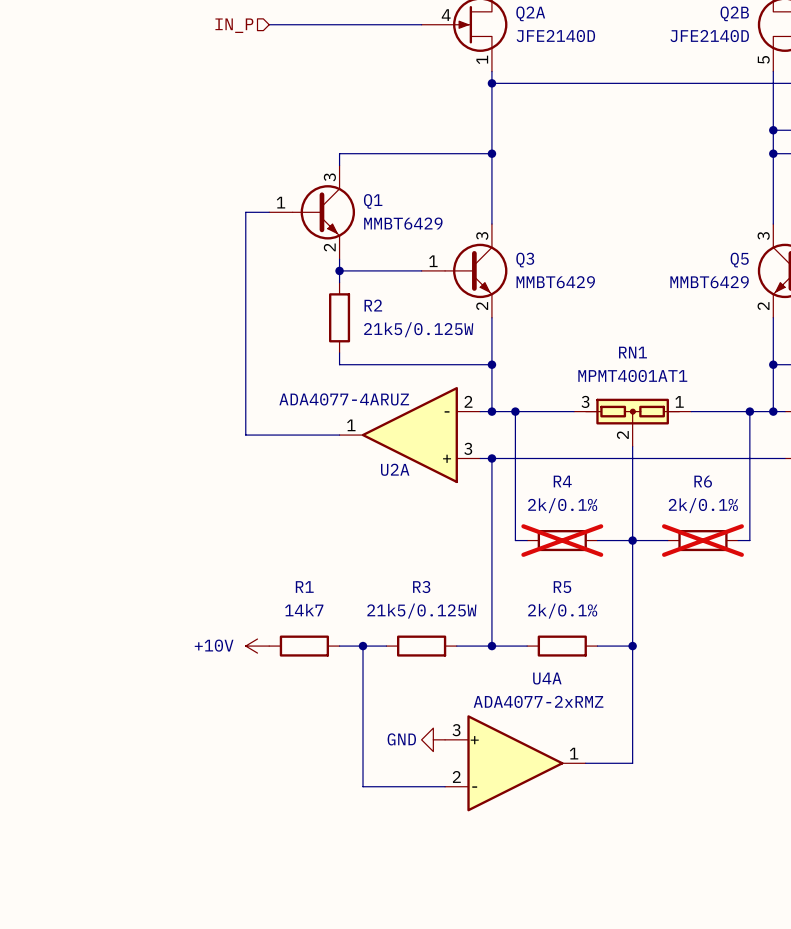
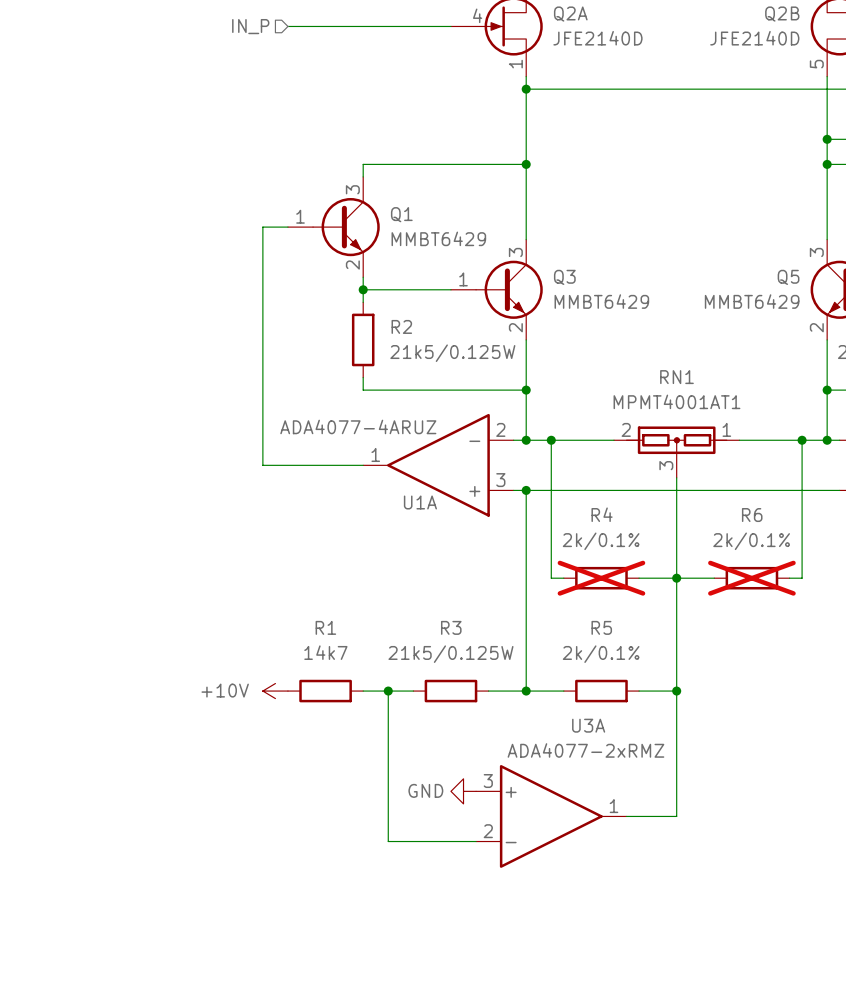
RN1 pin number: 3 (585, 401) -> 2 (626, 429)
RN1 pin number: 2 (622, 435) -> 3 (666, 465)
U2A name: U2A (395, 469) -> U1A (420, 502)
U4A name: U4A (547, 678) -> U3A (588, 725)

